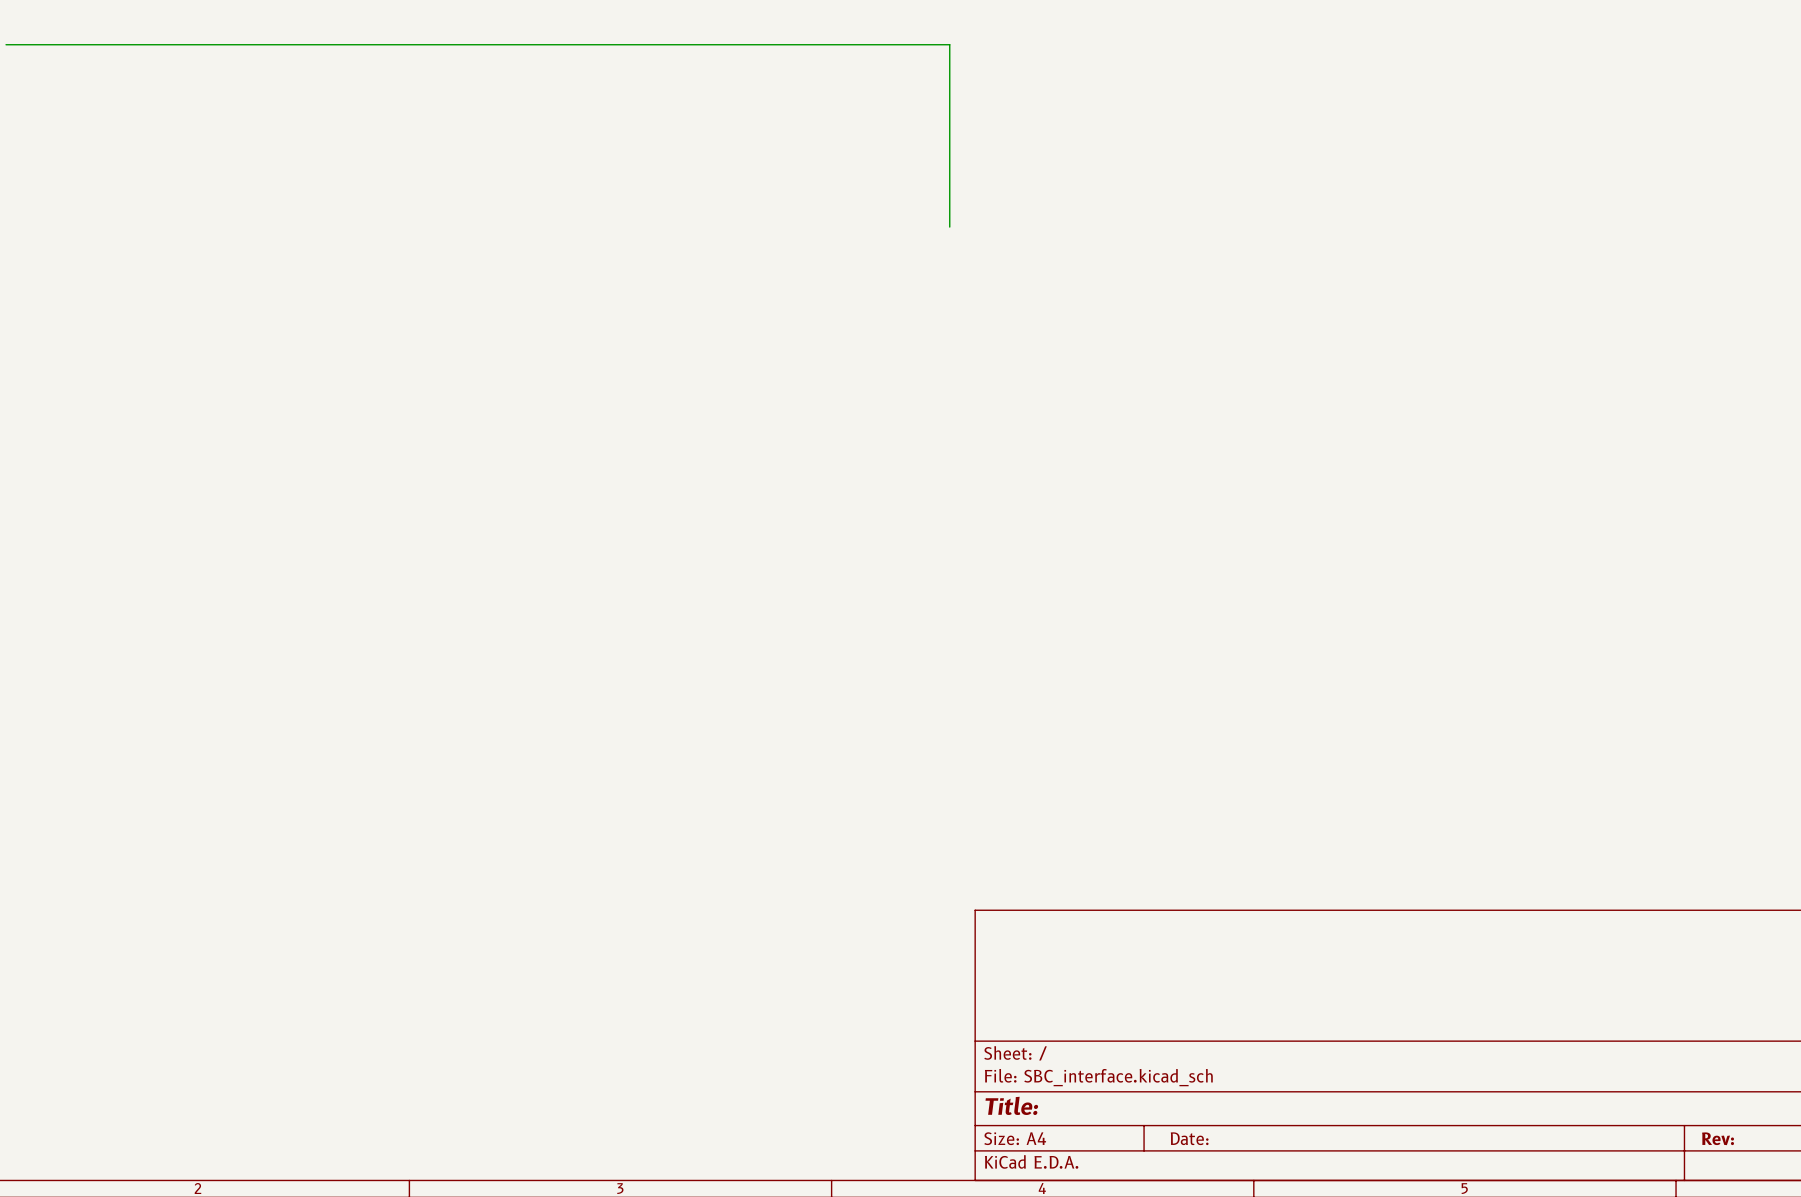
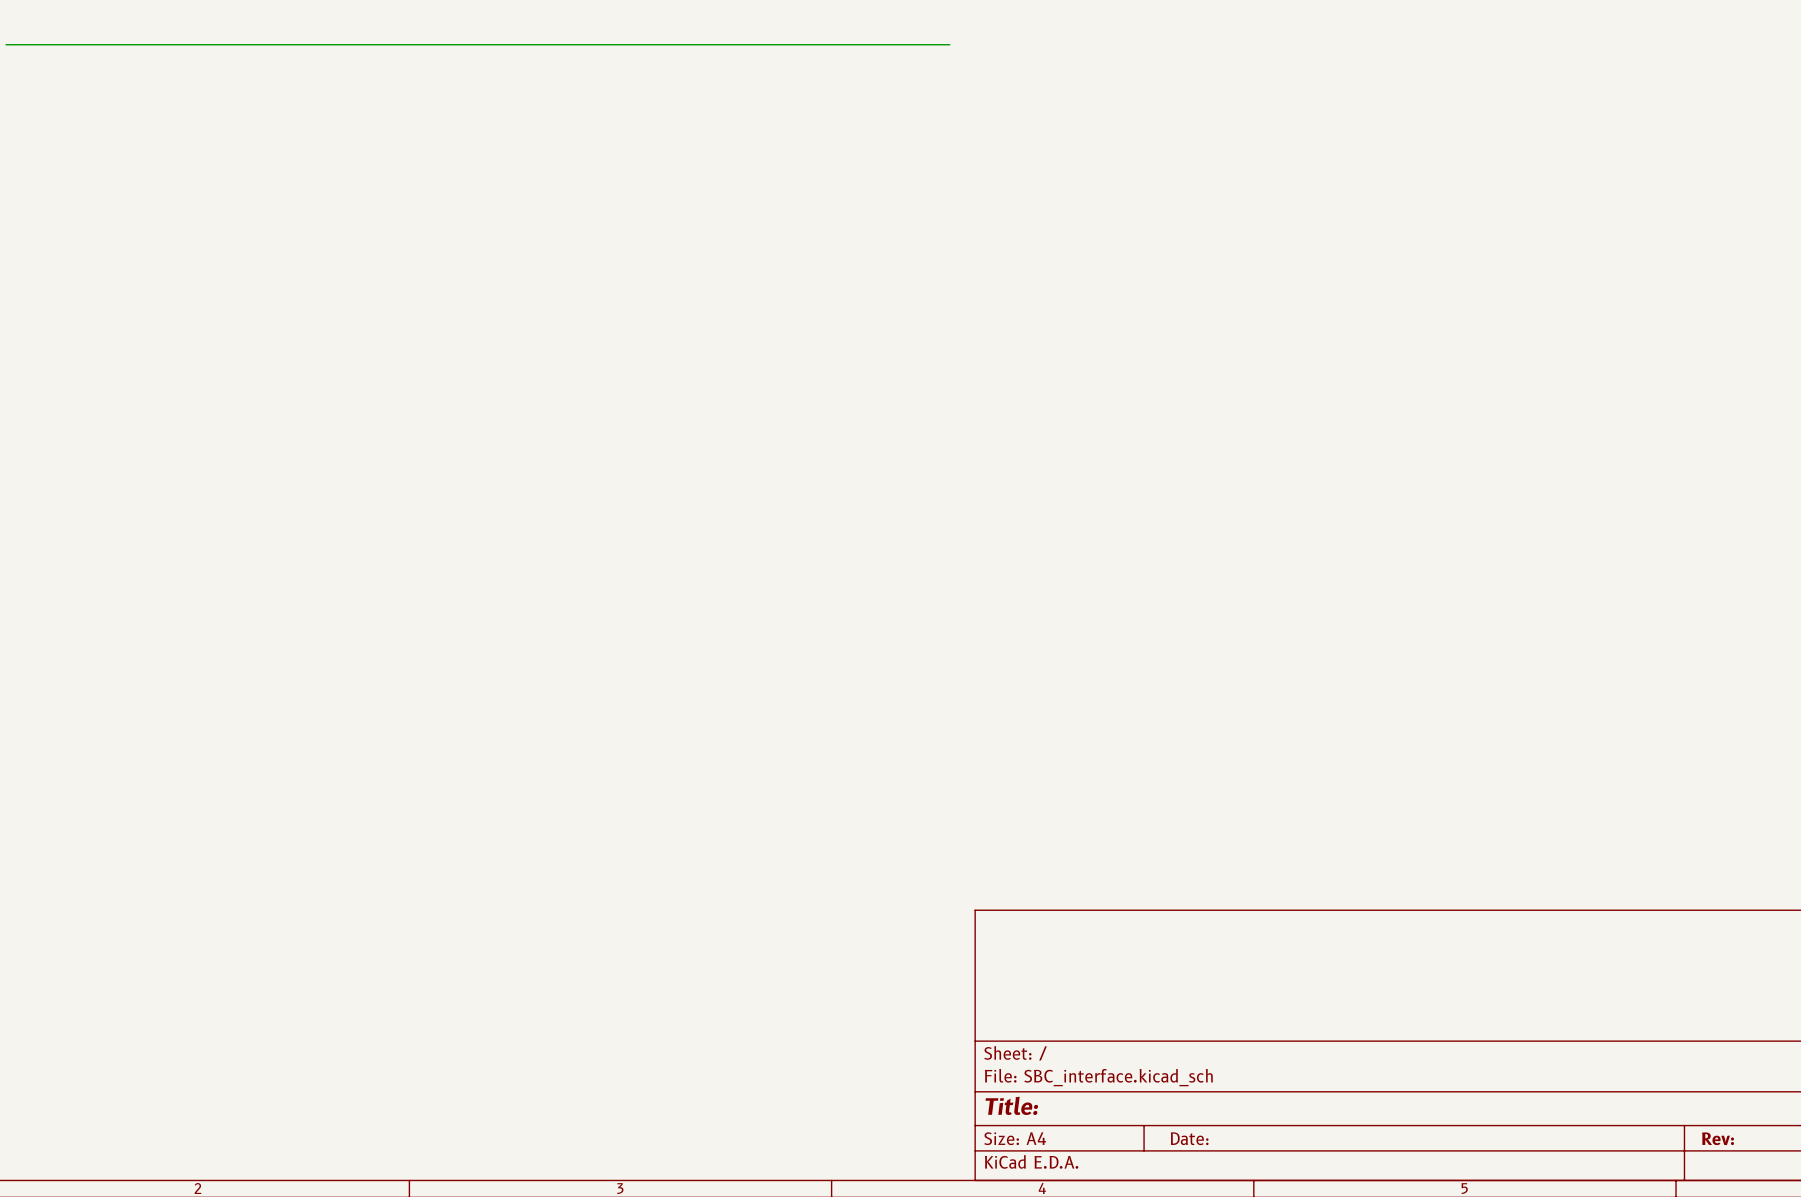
wire: (949, 44) (949, 227) -> none

